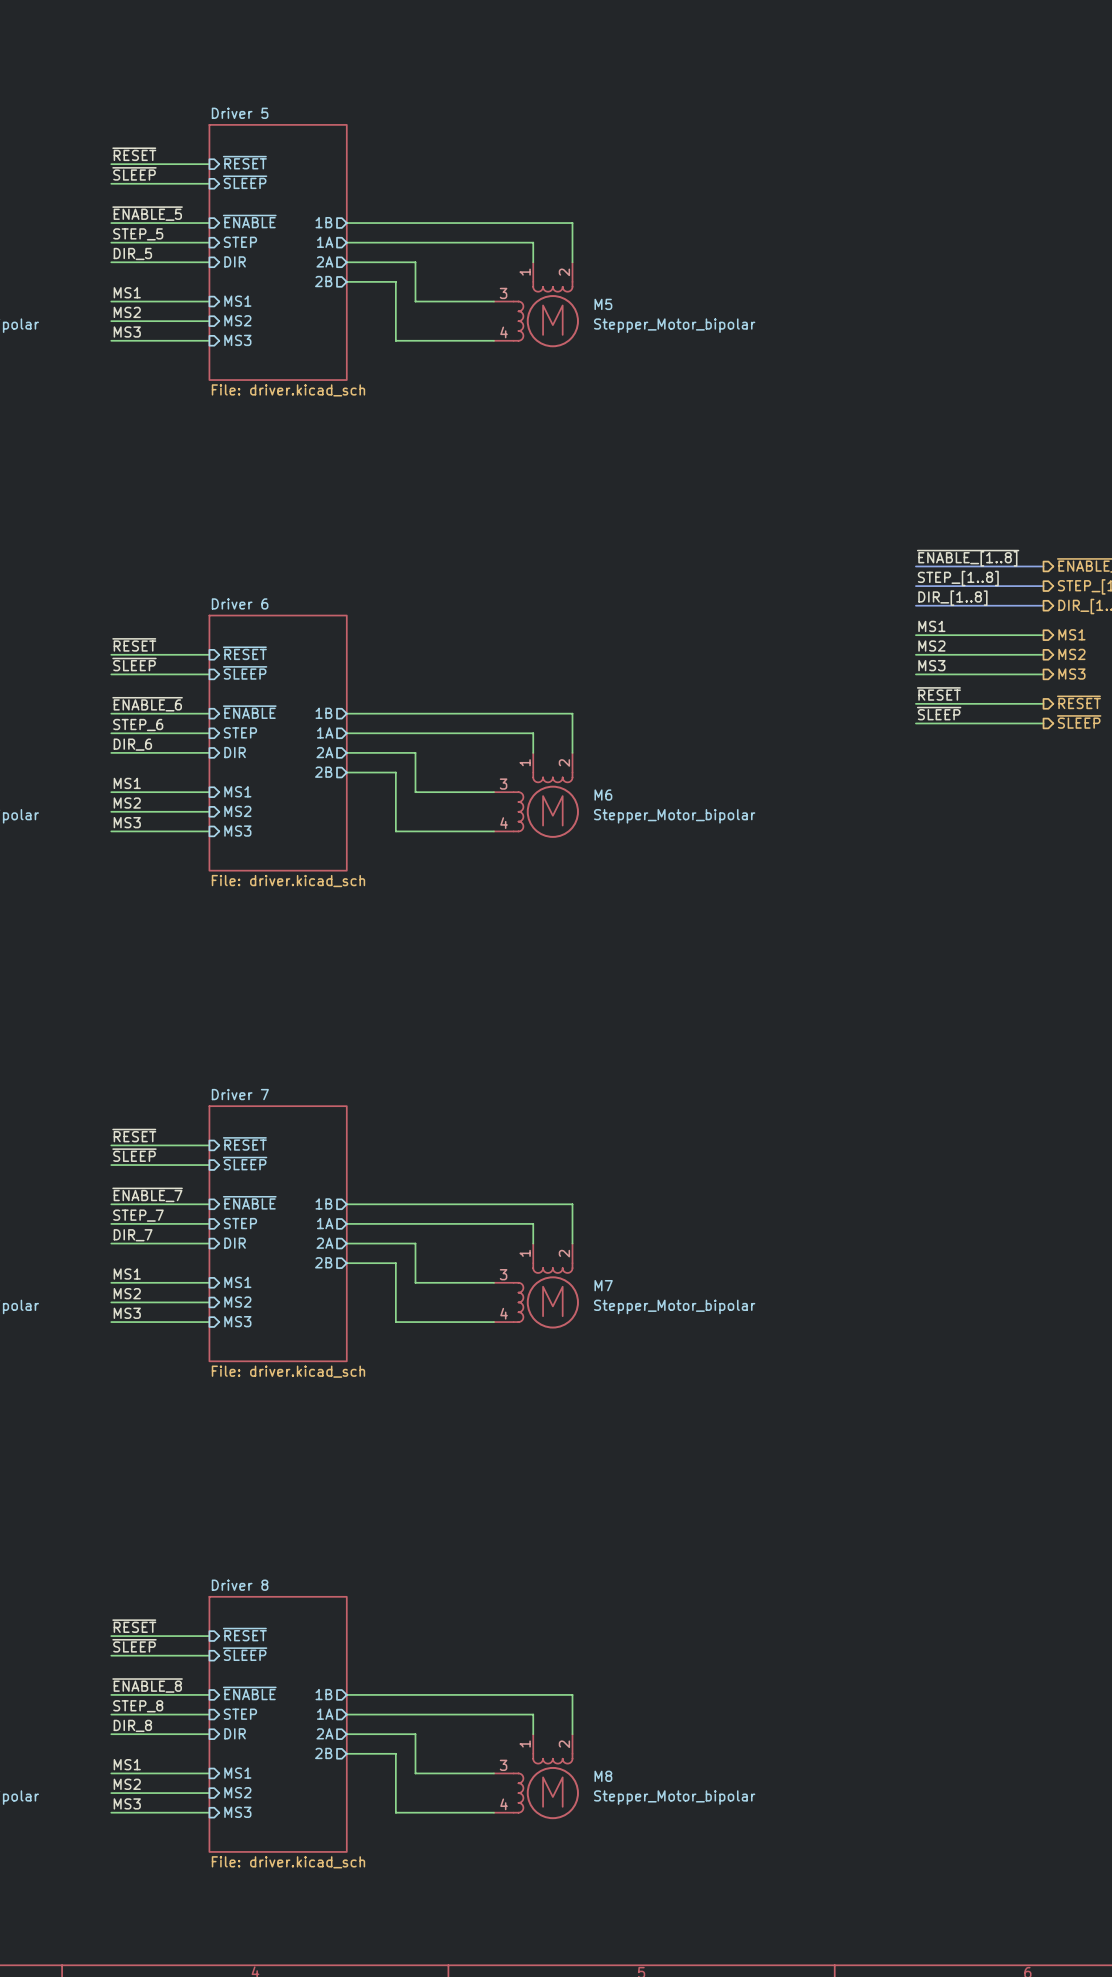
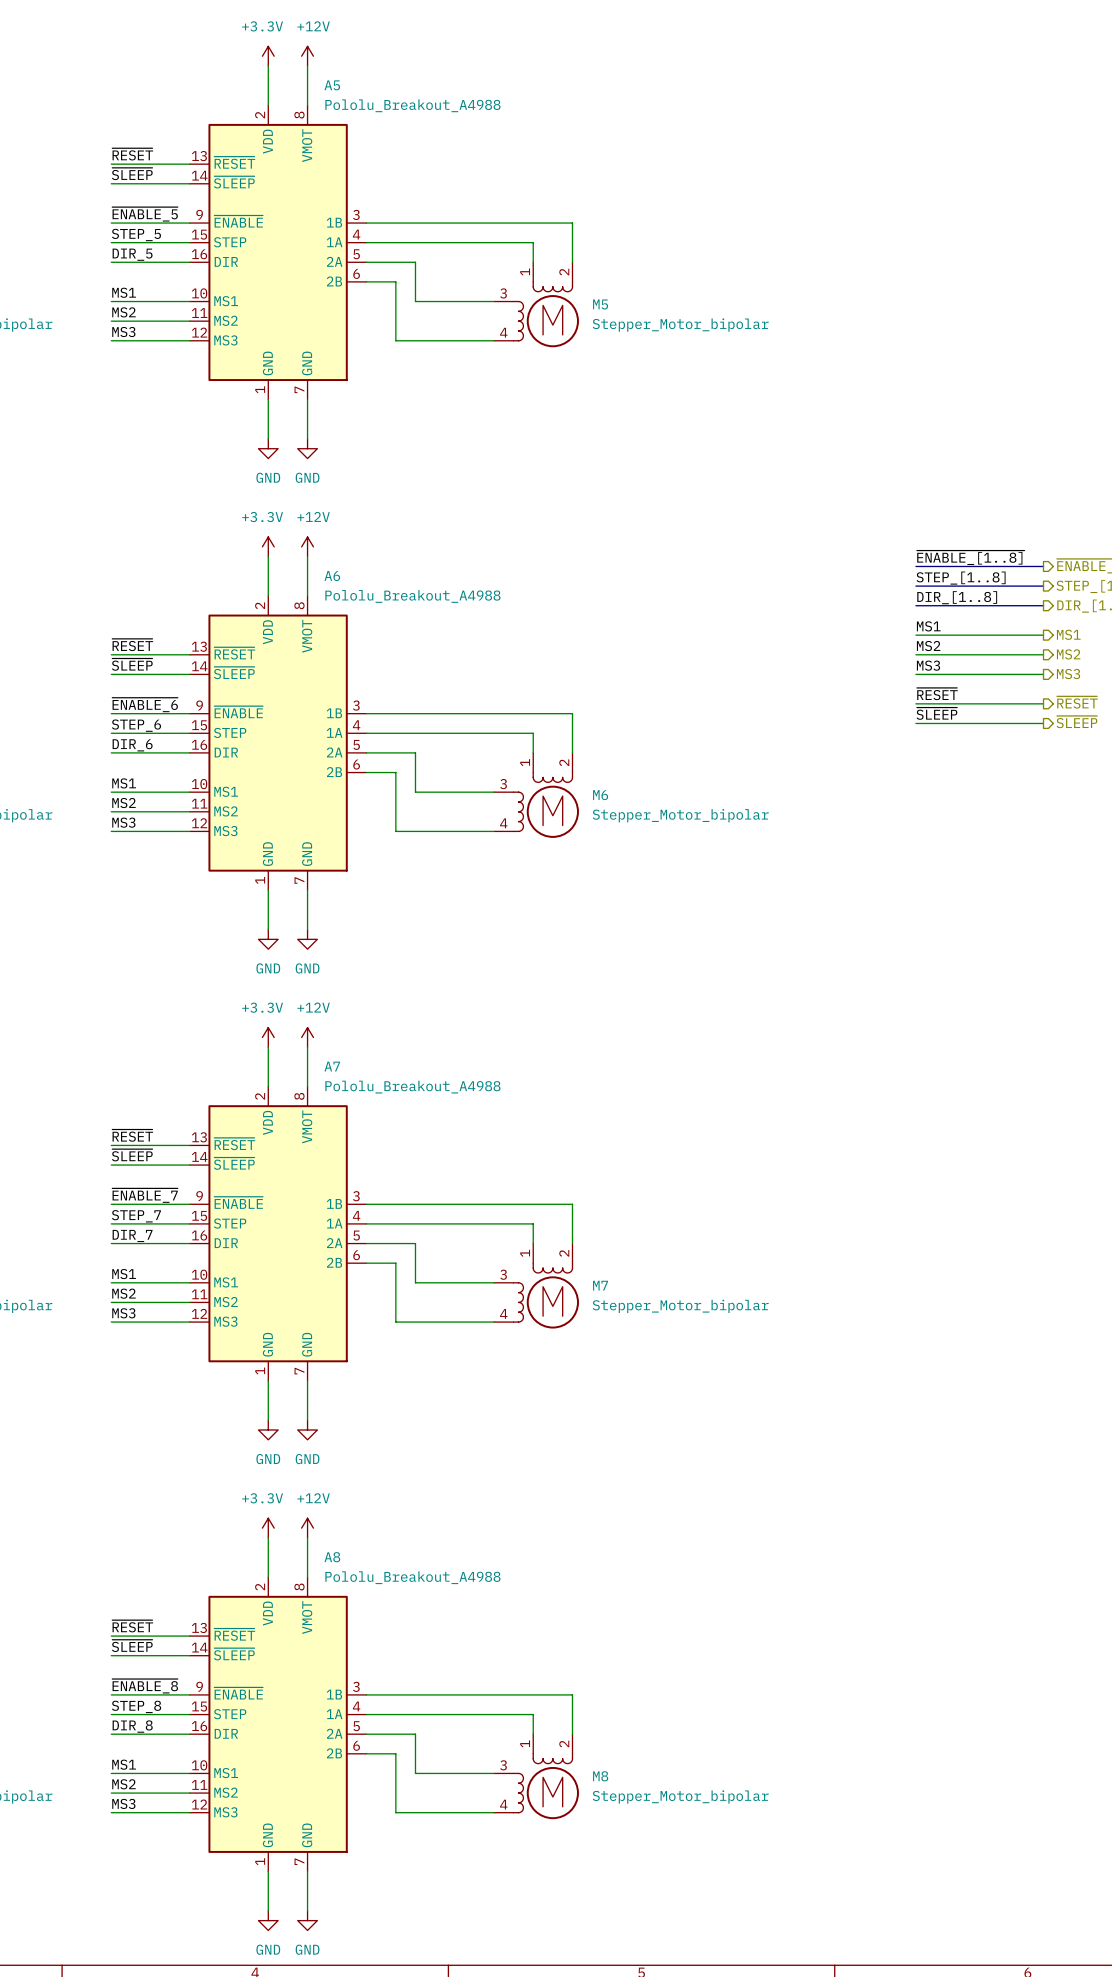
power symbol: none -> +3.3V (268, 56)
power symbol: none -> +12V (307, 56)
wire: none -> (268, 66) (268, 105)
wire: none -> (307, 66) (307, 105)
sheet pin: ~{RESET} (244, 162) -> none
sheet pin: ~{SLEEP} (245, 182) -> none
sheet pin: ~{ENABLE} (249, 221) -> none
sheet pin: 1B (323, 222) -> none
sheet pin: STEP (240, 242) -> none
sheet pin: 1A (325, 242) -> none
sheet Driver 5: File: driver.kicad_sch (278, 252) -> none
A5: none -> Pololu_Breakout_A4988 (278, 252)
sheet pin: DIR (235, 261) -> none
sheet pin: 2A (324, 261) -> none
sheet pin: 2B (323, 281) -> none
sheet pin: MS1 (237, 301) -> none
sheet pin: MS2 (237, 320) -> none
sheet pin: MS3 (237, 340) -> none
wire: none -> (268, 399) (268, 438)
wire: none -> (307, 399) (307, 438)
power symbol: none -> GND (268, 448)
power symbol: none -> GND (307, 448)
power symbol: none -> +3.3V (268, 546)
power symbol: none -> +12V (307, 546)
wire: none -> (268, 556) (268, 595)
wire: none -> (307, 556) (307, 595)
sheet pin: ~{RESET} (244, 653) -> none
sheet pin: ~{SLEEP} (245, 672) -> none
sheet pin: ~{ENABLE} (249, 712) -> none
sheet pin: 1B (323, 713) -> none
sheet pin: STEP (240, 732) -> none
sheet pin: 1A (325, 732) -> none
sheet Driver 6: File: driver.kicad_sch (278, 743) -> none
A6: none -> Pololu_Breakout_A4988 (278, 743)
sheet pin: DIR (235, 752) -> none
sheet pin: 2A (324, 752) -> none
sheet pin: 2B (323, 772) -> none
sheet pin: MS1 (237, 791) -> none
sheet pin: MS2 (237, 811) -> none
sheet pin: MS3 (237, 831) -> none
wire: none -> (268, 890) (268, 929)
wire: none -> (307, 890) (307, 929)
power symbol: none -> GND (268, 939)
power symbol: none -> GND (307, 939)
power symbol: none -> +3.3V (268, 1037)
power symbol: none -> +12V (307, 1037)
wire: none -> (268, 1047) (268, 1086)
wire: none -> (307, 1047) (307, 1086)
sheet pin: ~{RESET} (244, 1143) -> none
sheet pin: ~{SLEEP} (245, 1163) -> none
sheet pin: ~{ENABLE} (249, 1202) -> none
sheet pin: 1B (323, 1203) -> none
sheet pin: STEP (240, 1223) -> none
sheet pin: 1A (325, 1223) -> none
sheet Driver 7: File: driver.kicad_sch (278, 1233) -> none
A7: none -> Pololu_Breakout_A4988 (278, 1233)
sheet pin: DIR (235, 1243) -> none
sheet pin: 2A (324, 1243) -> none
sheet pin: 2B (323, 1262) -> none
sheet pin: MS1 (237, 1282) -> none
sheet pin: MS2 (237, 1302) -> none
sheet pin: MS3 (237, 1321) -> none
wire: none -> (268, 1380) (268, 1420)
wire: none -> (307, 1380) (307, 1420)
power symbol: none -> GND (268, 1429)
power symbol: none -> GND (307, 1429)
power symbol: none -> +3.3V (268, 1528)
power symbol: none -> +12V (307, 1528)
wire: none -> (268, 1537) (268, 1577)
wire: none -> (307, 1537) (307, 1577)
sheet pin: ~{RESET} (244, 1634) -> none
sheet pin: ~{SLEEP} (245, 1654) -> none
sheet pin: ~{ENABLE} (249, 1693) -> none
sheet pin: 1B (323, 1694) -> none
sheet pin: STEP (240, 1714) -> none
sheet pin: 1A (325, 1714) -> none
sheet Driver 8: File: driver.kicad_sch (278, 1724) -> none
A8: none -> Pololu_Breakout_A4988 (278, 1724)
sheet pin: DIR (235, 1733) -> none
sheet pin: 2A (324, 1733) -> none
sheet pin: 2B (323, 1753) -> none
sheet pin: MS1 (237, 1773) -> none
sheet pin: MS2 (237, 1792) -> none
sheet pin: MS3 (237, 1812) -> none
wire: none -> (268, 1871) (268, 1910)
wire: none -> (307, 1871) (307, 1910)
power symbol: none -> GND (268, 1920)
power symbol: none -> GND (307, 1920)

